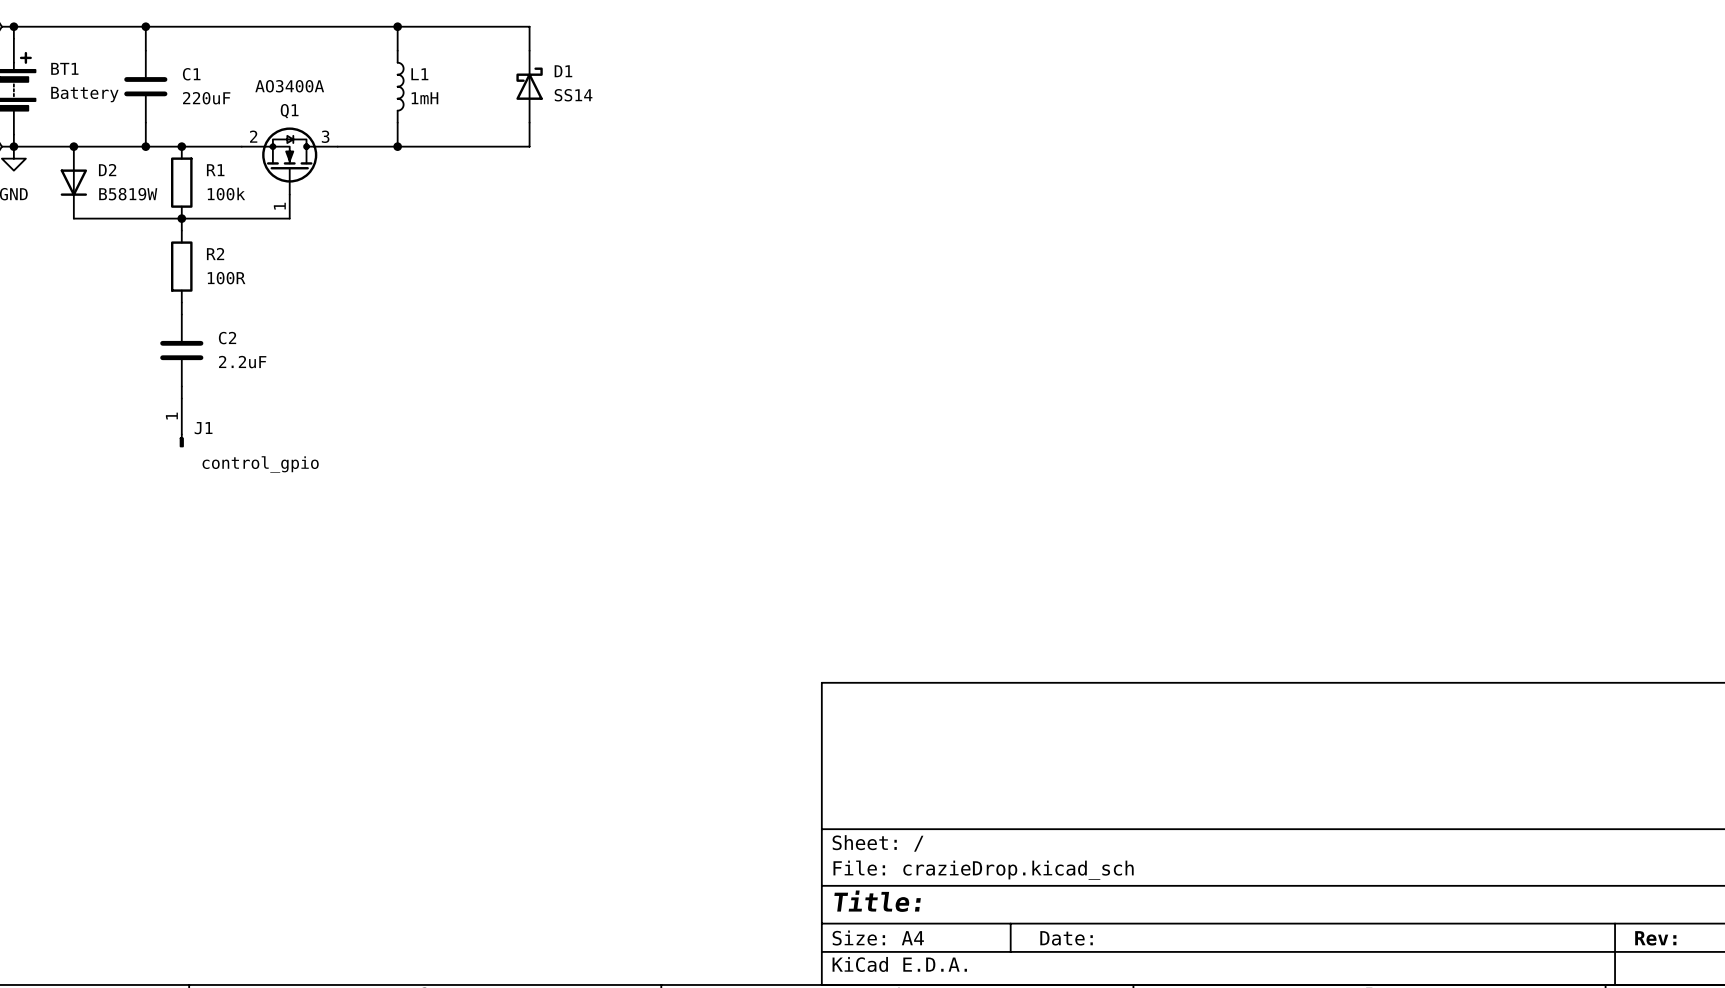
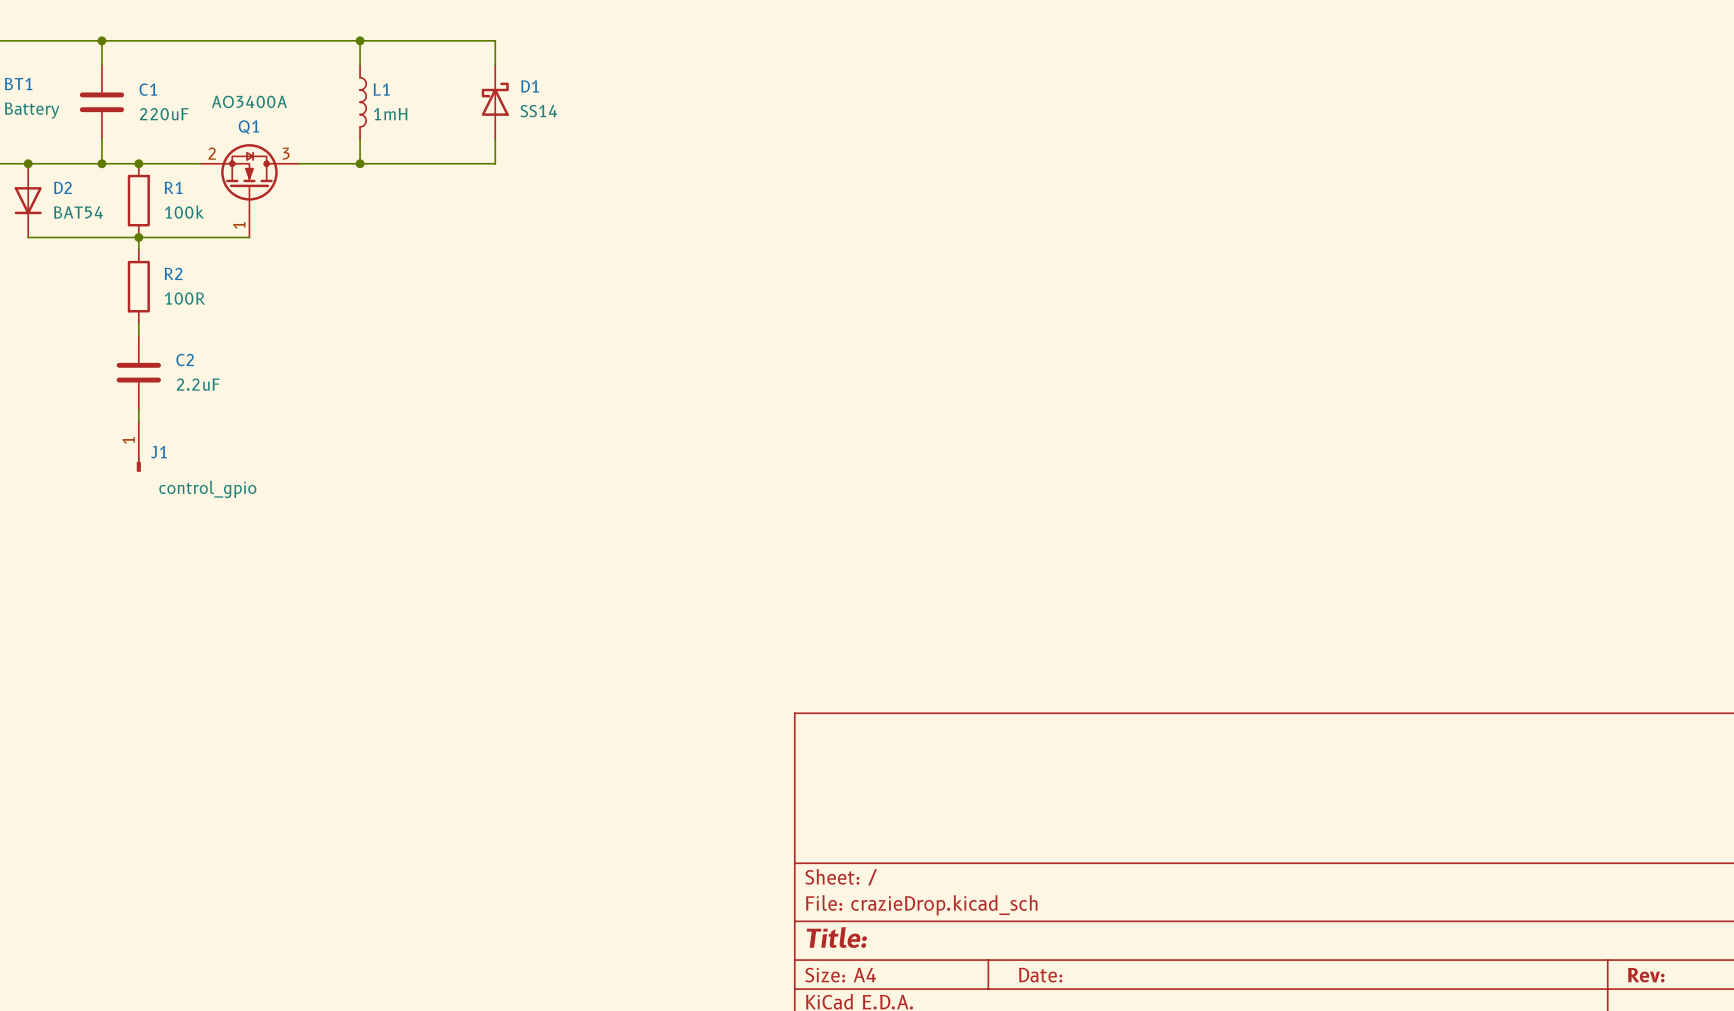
D2 value: B5819W (128, 194) -> BAT54 (78, 212)

